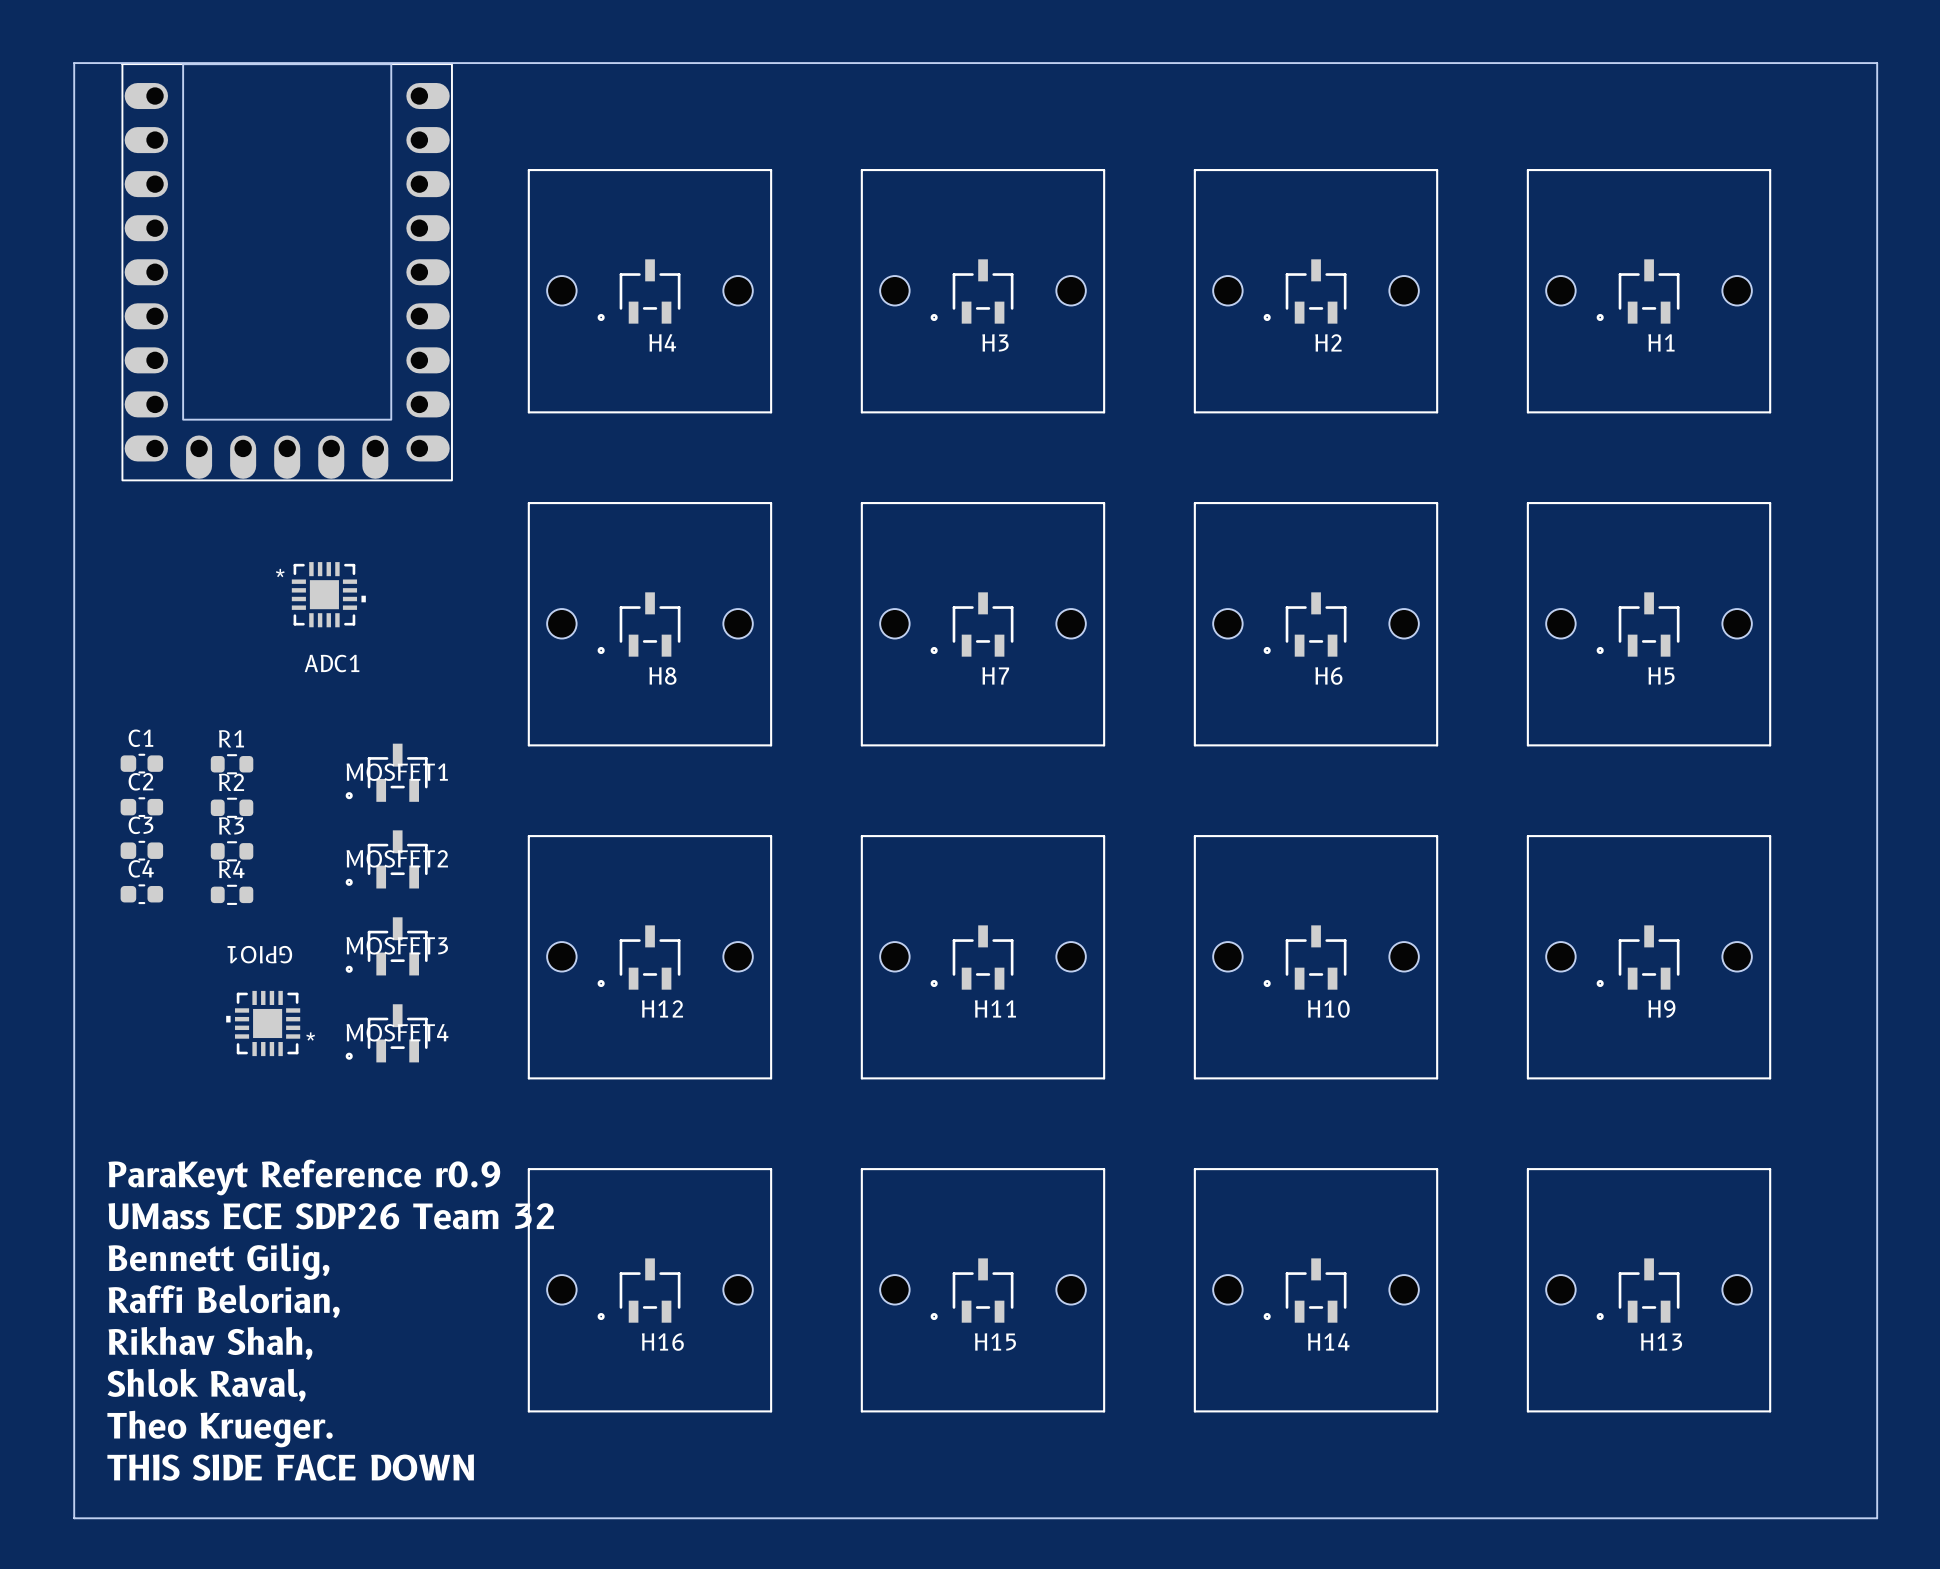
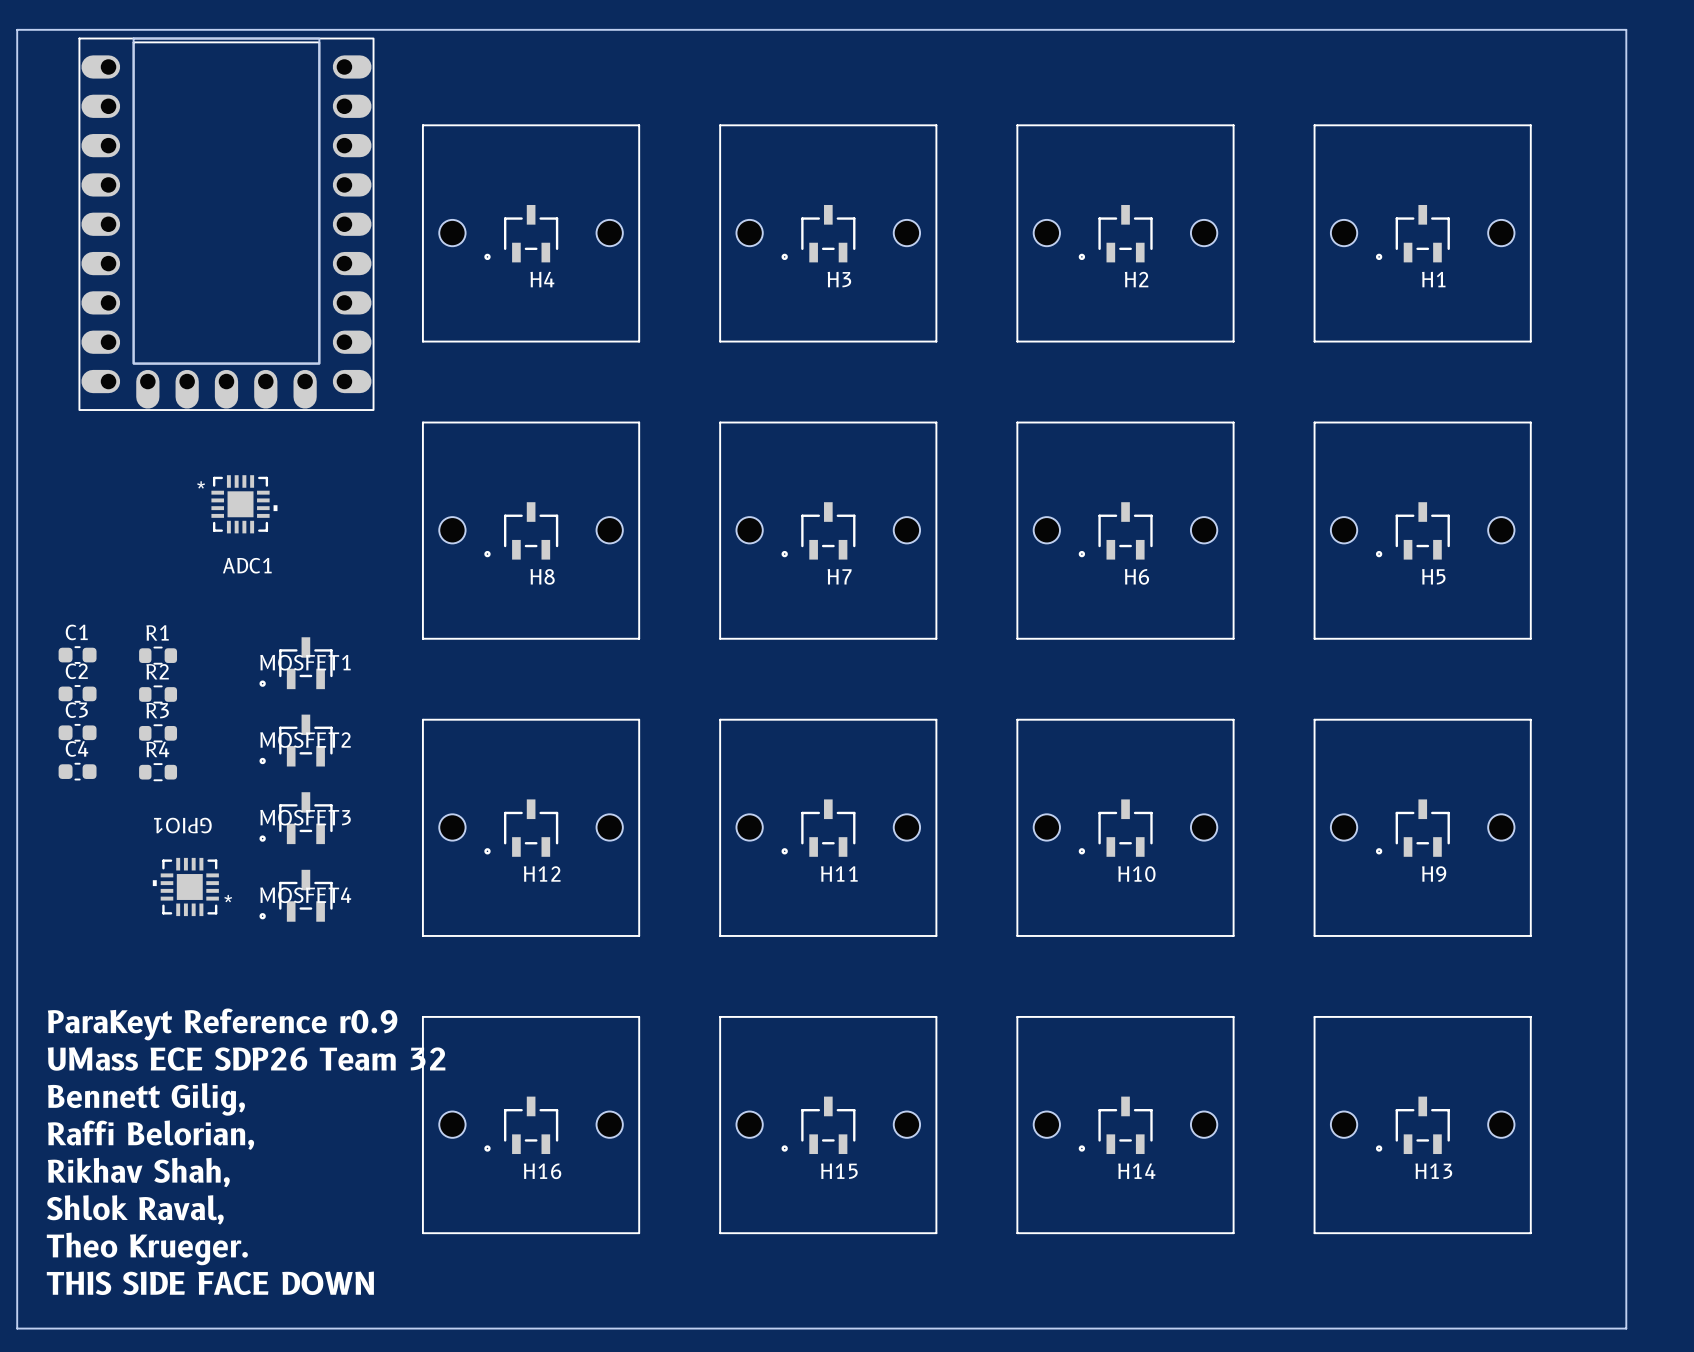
part: (287, 272) -> none
part: none -> (226, 224)

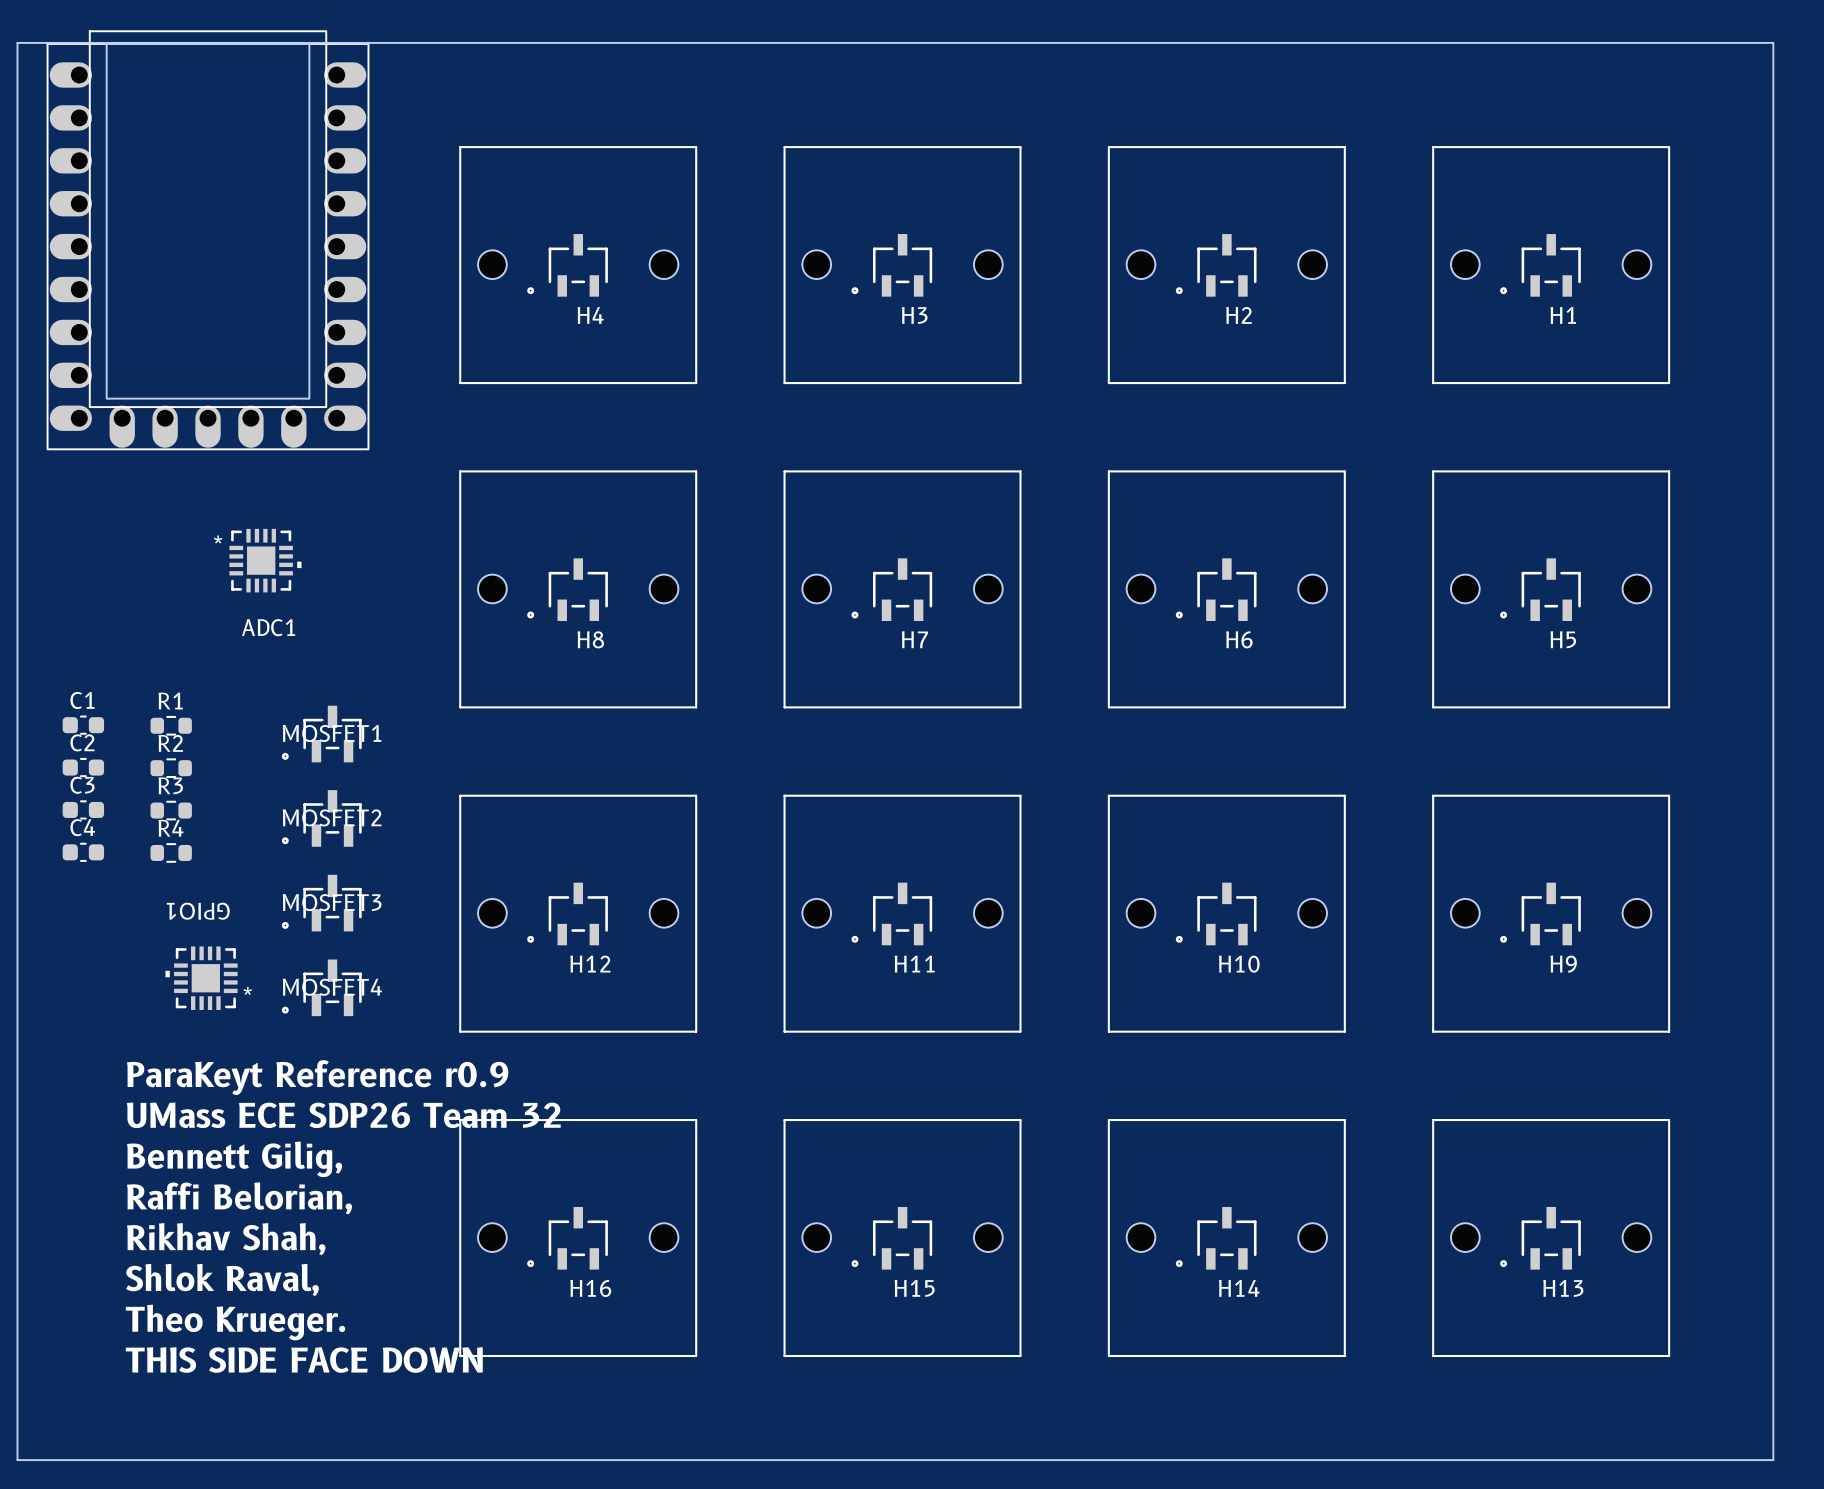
part: none -> (208, 240)
part: (226, 224) -> none
text position: ParaKeyt Reference r0.9 (222, 1024) -> ParaKeyt Reference r0.9 (317, 1077)
text position: UMass ECE SDP26 Team 32 (246, 1059) -> UMass ECE SDP26 Team 32 (343, 1115)
text position: Bennett Gilig, (146, 1099) -> Bennett Gilig, (234, 1159)
text position: Raffi Belorian, (150, 1135) -> Raffi Belorian, (239, 1198)
text position: Rikhav Shah, (138, 1172) -> Rikhav Shah, (226, 1239)
text position: Shlok Raval, (135, 1209) -> Shlok Raval, (222, 1279)
text position: Theo Krueger. (147, 1248) -> Theo Krueger. (235, 1322)
text position: THIS SIDE FACE DOWN (210, 1283) -> THIS SIDE FACE DOWN (304, 1360)

